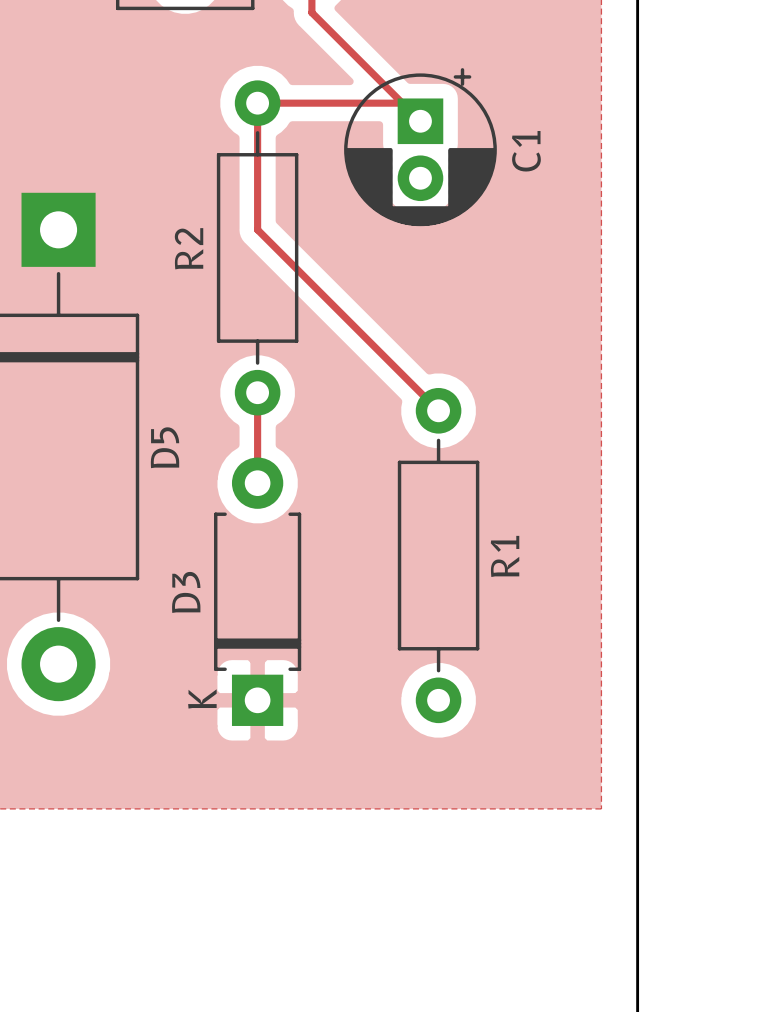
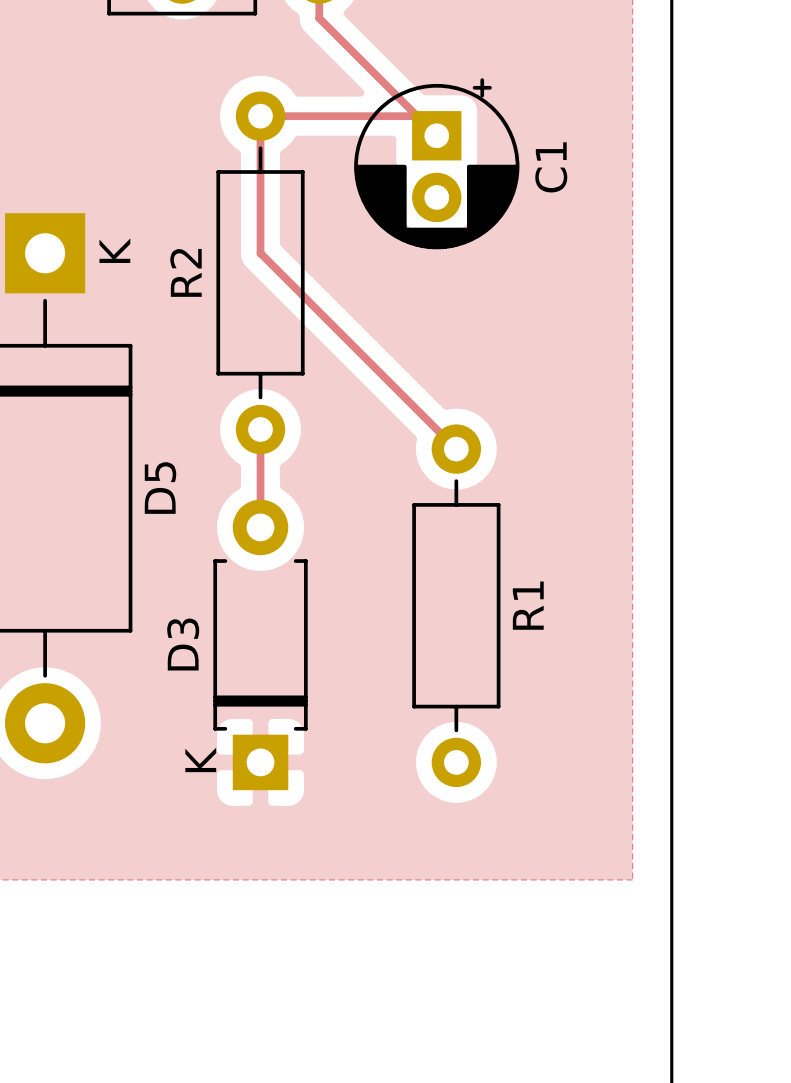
D5 text: none -> K (114, 250)

